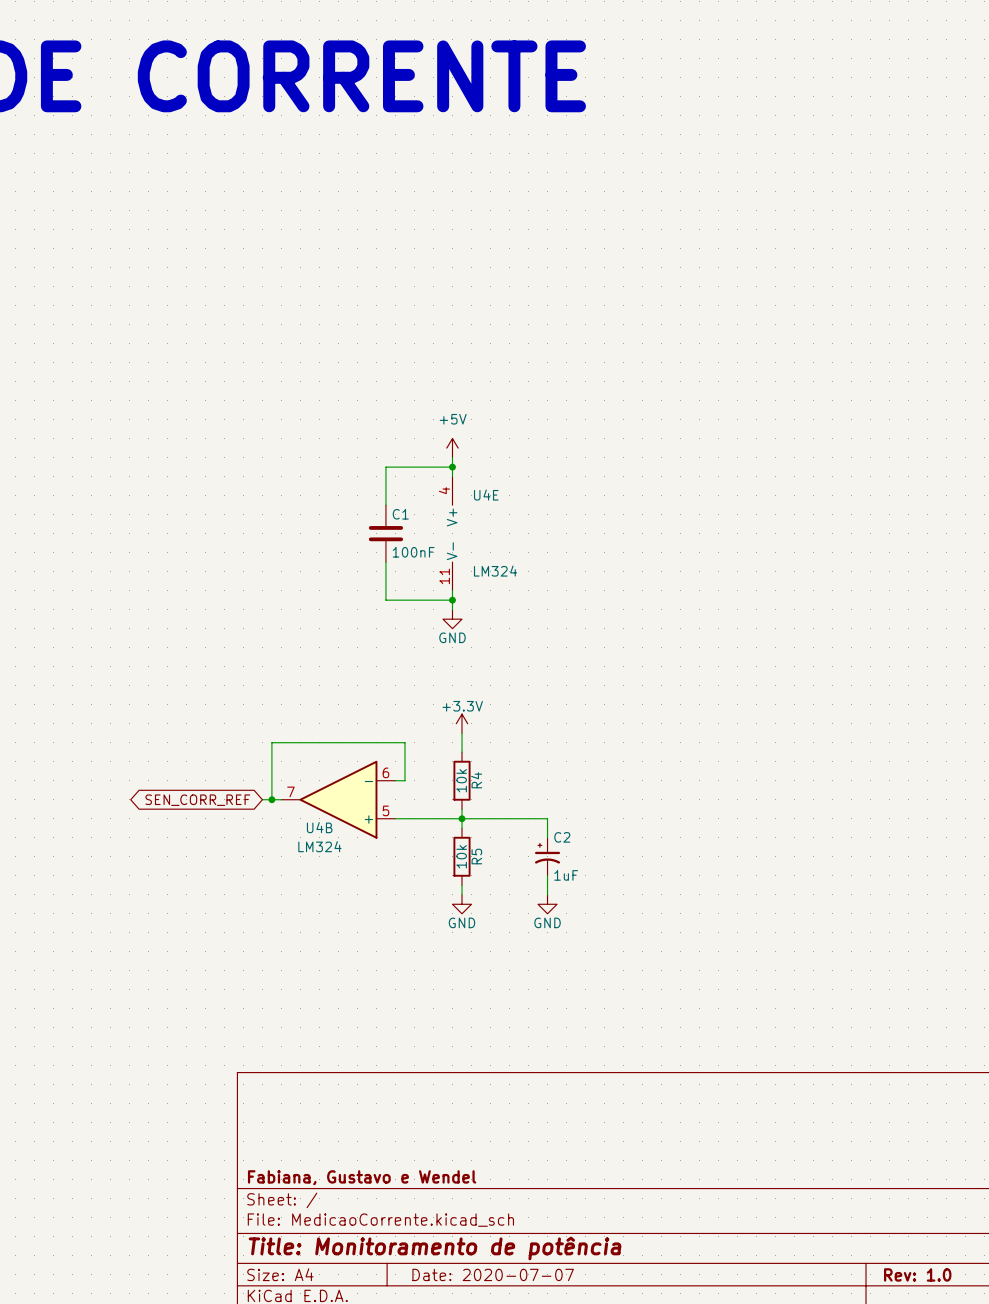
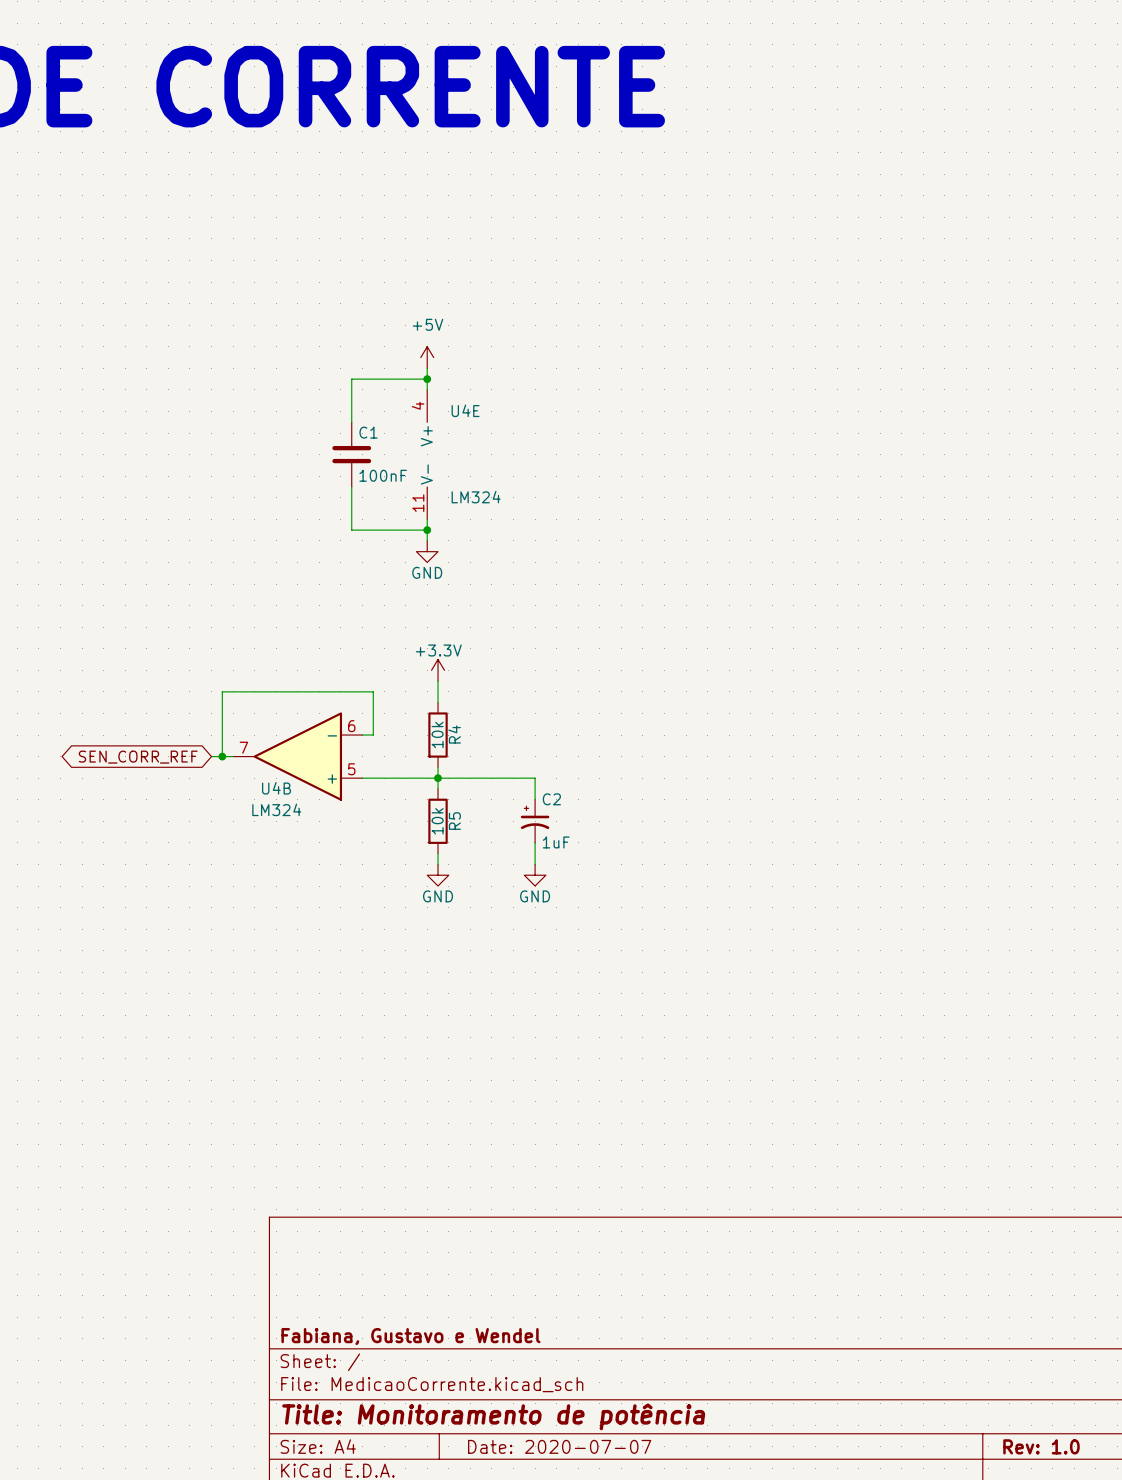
junction: none -> (427, 379)
power symbol position: +5V (452, 448) -> +5V (427, 357)
wire: (452, 457) (452, 476) -> (427, 368) (427, 389)
junction: none -> (427, 530)
wire: (452, 467) (385, 467) (385, 505) -> (427, 379) (351, 379) (351, 422)
junction: (452, 467) -> none
power symbol: none -> GND (427, 551)
C1 position: (385, 533) -> (351, 454)
U4E position: (452, 533) -> (427, 454)
wire: (385, 562) (385, 600) (452, 600) -> (351, 486) (351, 530) (427, 530)
wire: (452, 590) (452, 609) -> (427, 519) (427, 540)
junction: (452, 600) -> none
power symbol: GND (452, 619) -> none
junction: none -> (222, 756)
junction: none -> (438, 778)
power symbol position: +3.3V (461, 723) -> +3.3V (438, 670)
wire: (461, 733) (461, 752) -> (438, 681) (438, 702)
power symbol: none -> GND (438, 875)
power symbol: none -> GND (535, 875)
wire: (395, 780) (404, 780) (404, 742) (271, 742) (271, 799) -> (362, 735) (373, 735) (373, 691) (222, 691) (222, 756)
R4 position: (461, 780) -> (438, 735)
wire: (262, 799) (281, 799) -> (211, 756) (233, 756)
junction: (271, 799) -> none
U4B position: (338, 799) -> (297, 756)
global label position: SEN_CORR_REF (197, 800) -> SEN_CORR_REF (138, 757)
wire: (461, 809) (461, 828) -> (438, 767) (438, 788)
wire: (395, 818) (547, 818) (547, 837) -> (362, 778) (535, 778) (535, 799)
junction: (461, 818) -> none
R5 position: (461, 856) -> (438, 821)
C2 position: (547, 856) -> (535, 821)
wire: (547, 875) (547, 894) -> (535, 842) (535, 864)
wire: (461, 885) (461, 894) -> (438, 853) (438, 864)
power symbol: GND (461, 904) -> none
power symbol: GND (547, 904) -> none

